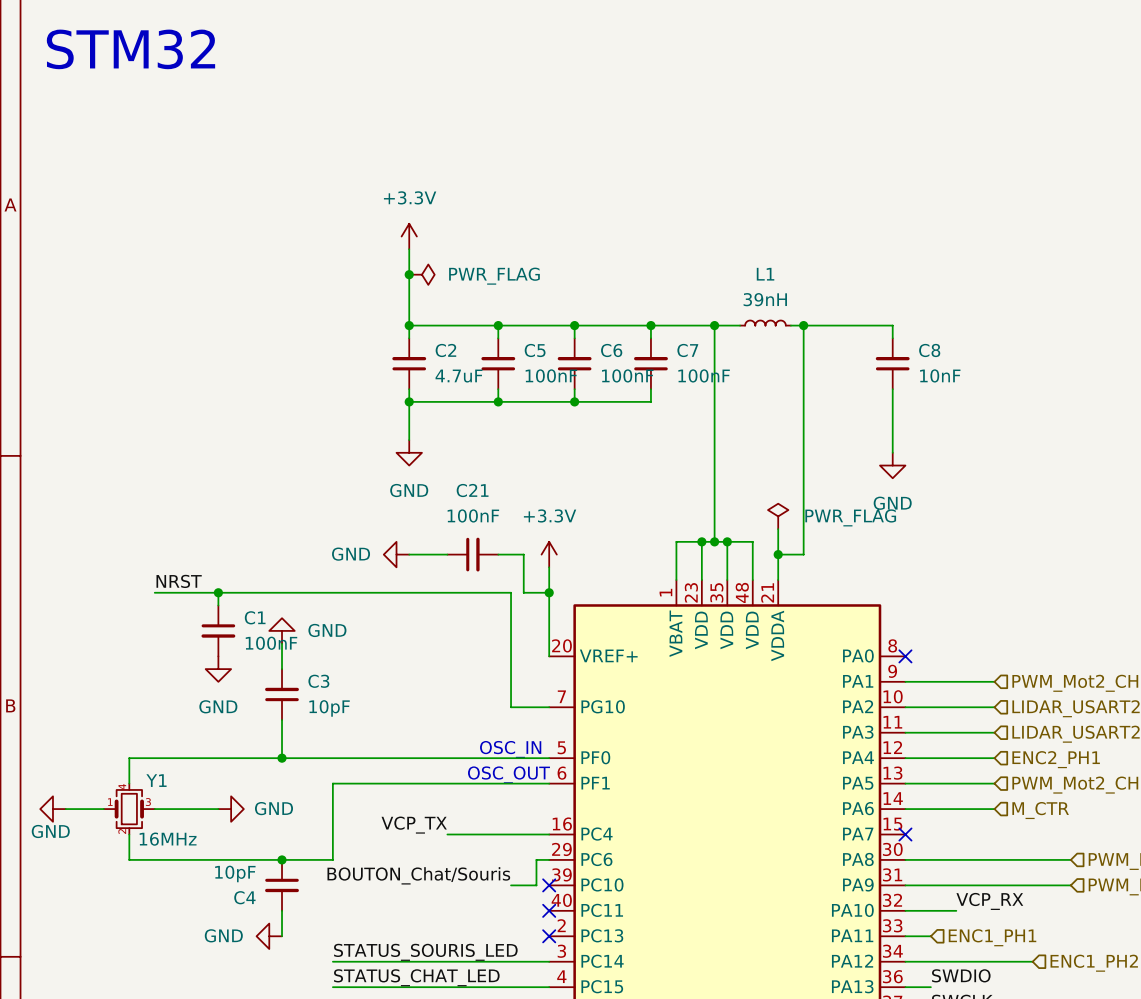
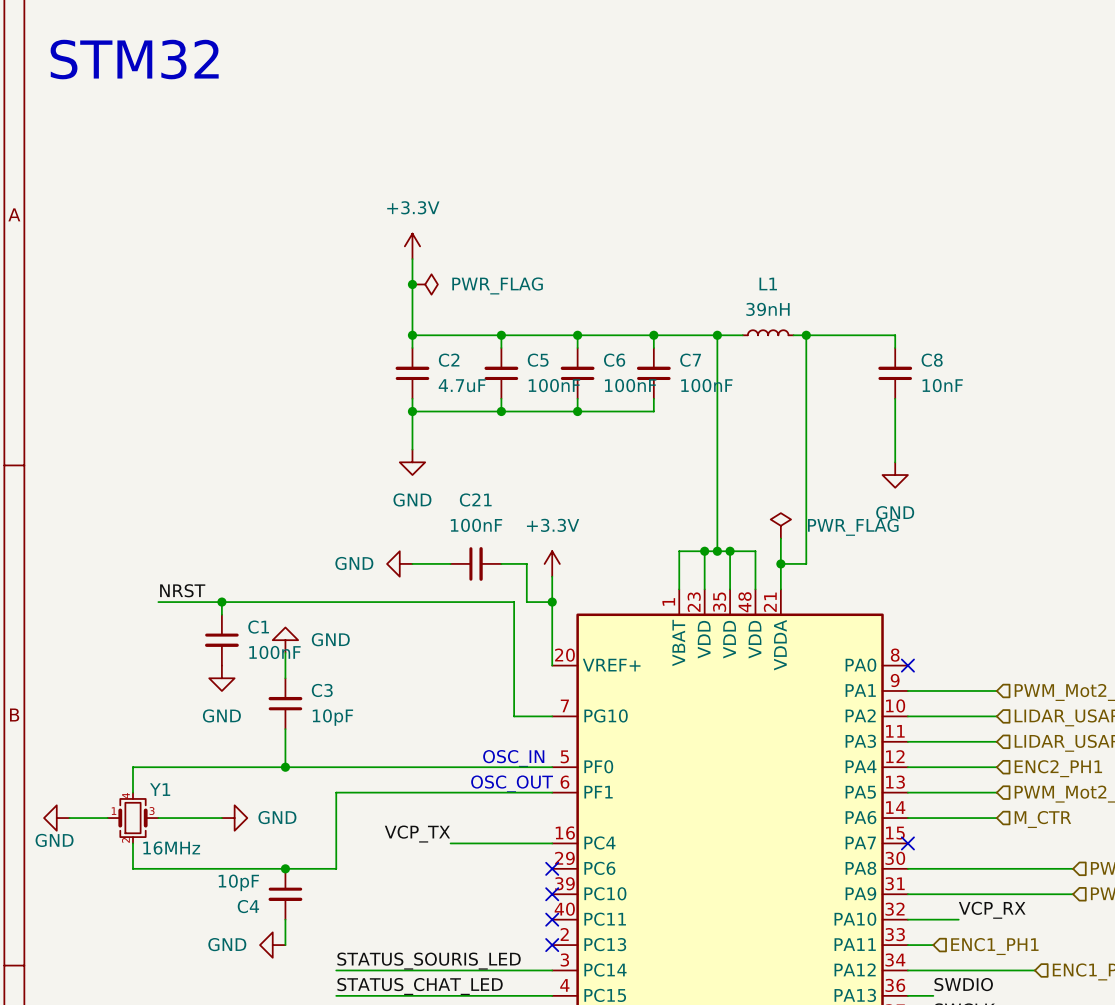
wire: (549, 859) (536, 859) (536, 885) (511, 885) -> none
no-connect mark: none -> (552, 868)
label: BOUTON_Chat/Souris (418, 875) -> none

